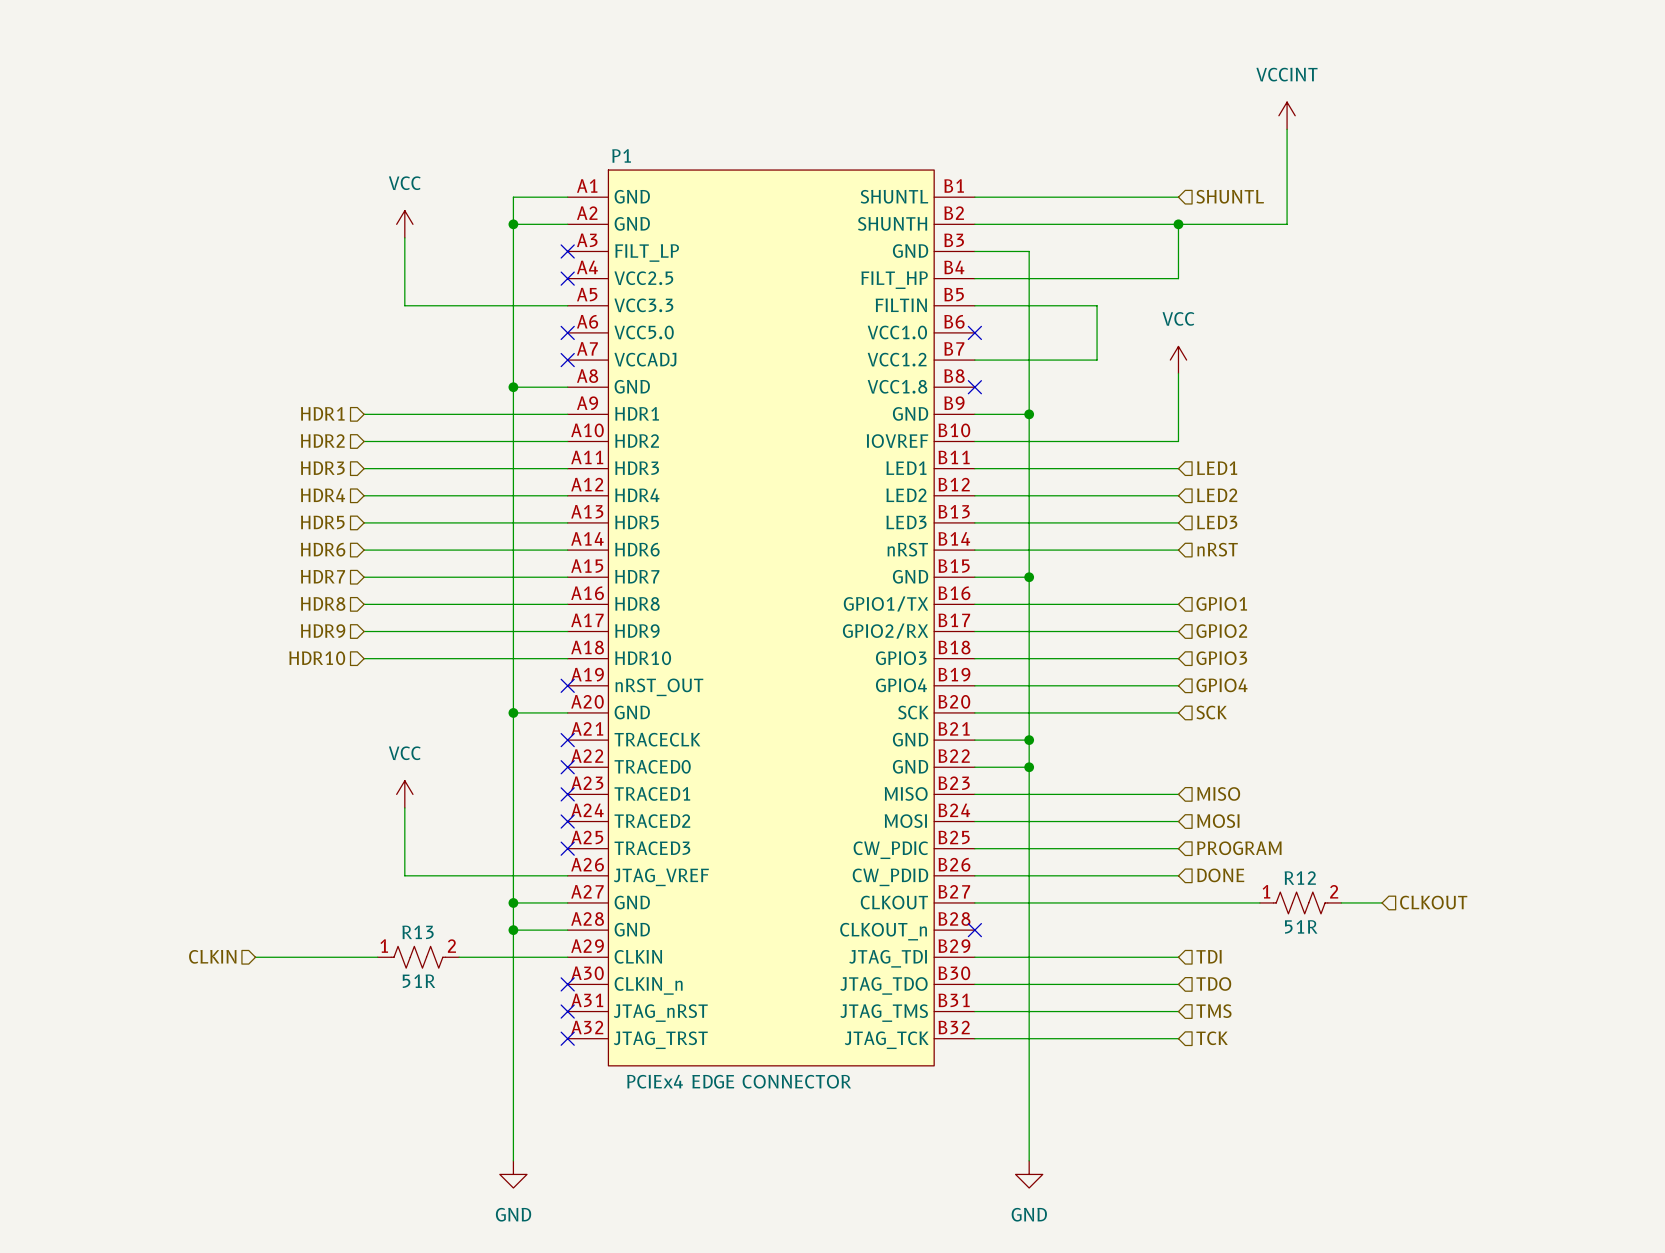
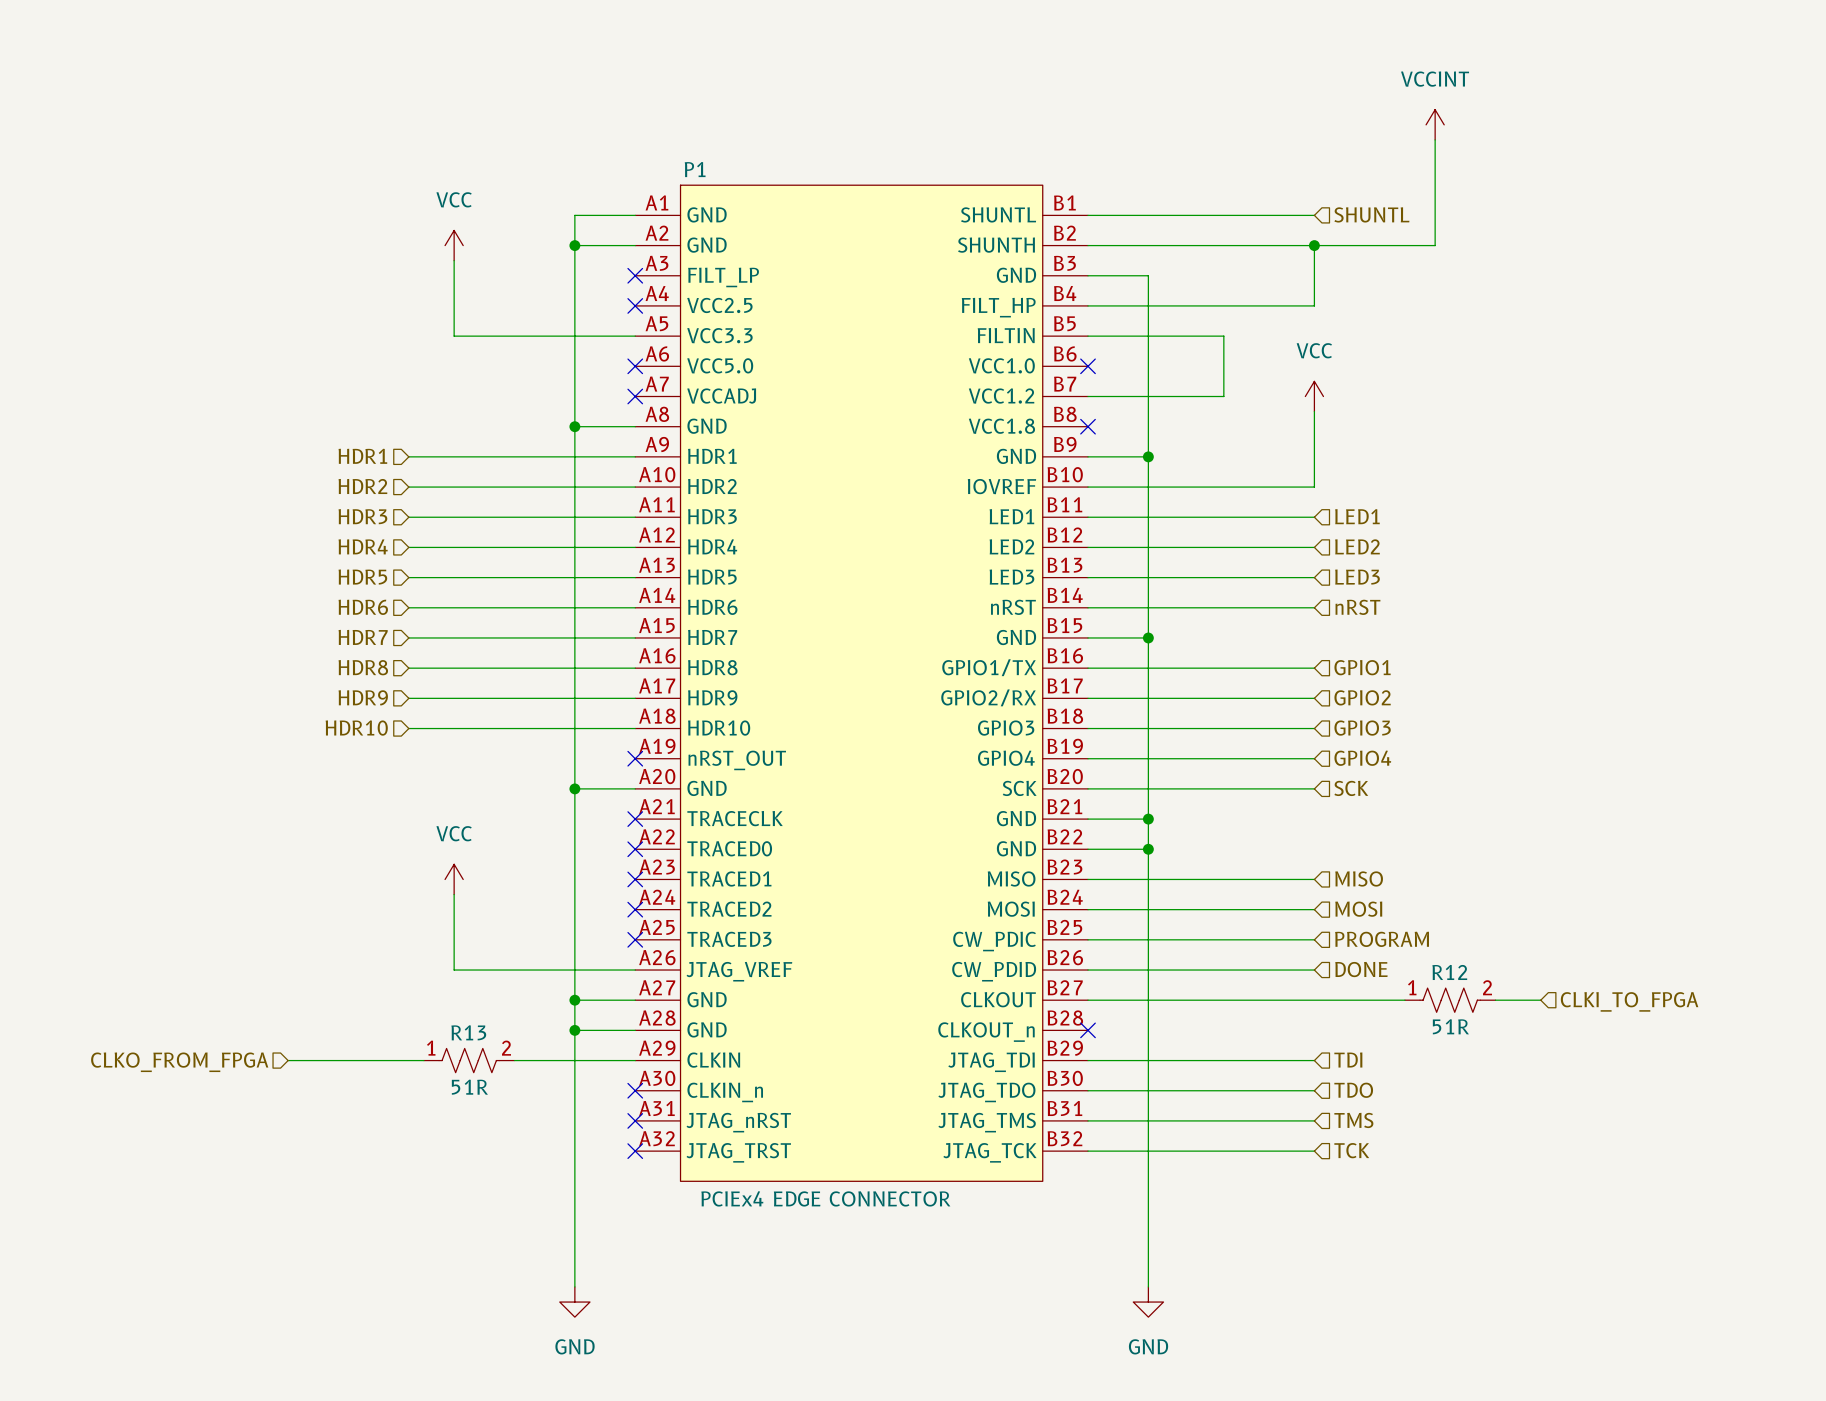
hierarchical label: CLKOUT (1433, 902) -> CLKI_TO_FPGA (1629, 1001)
hierarchical label: CLKIN (212, 956) -> CLKO_FROM_FPGA (179, 1062)

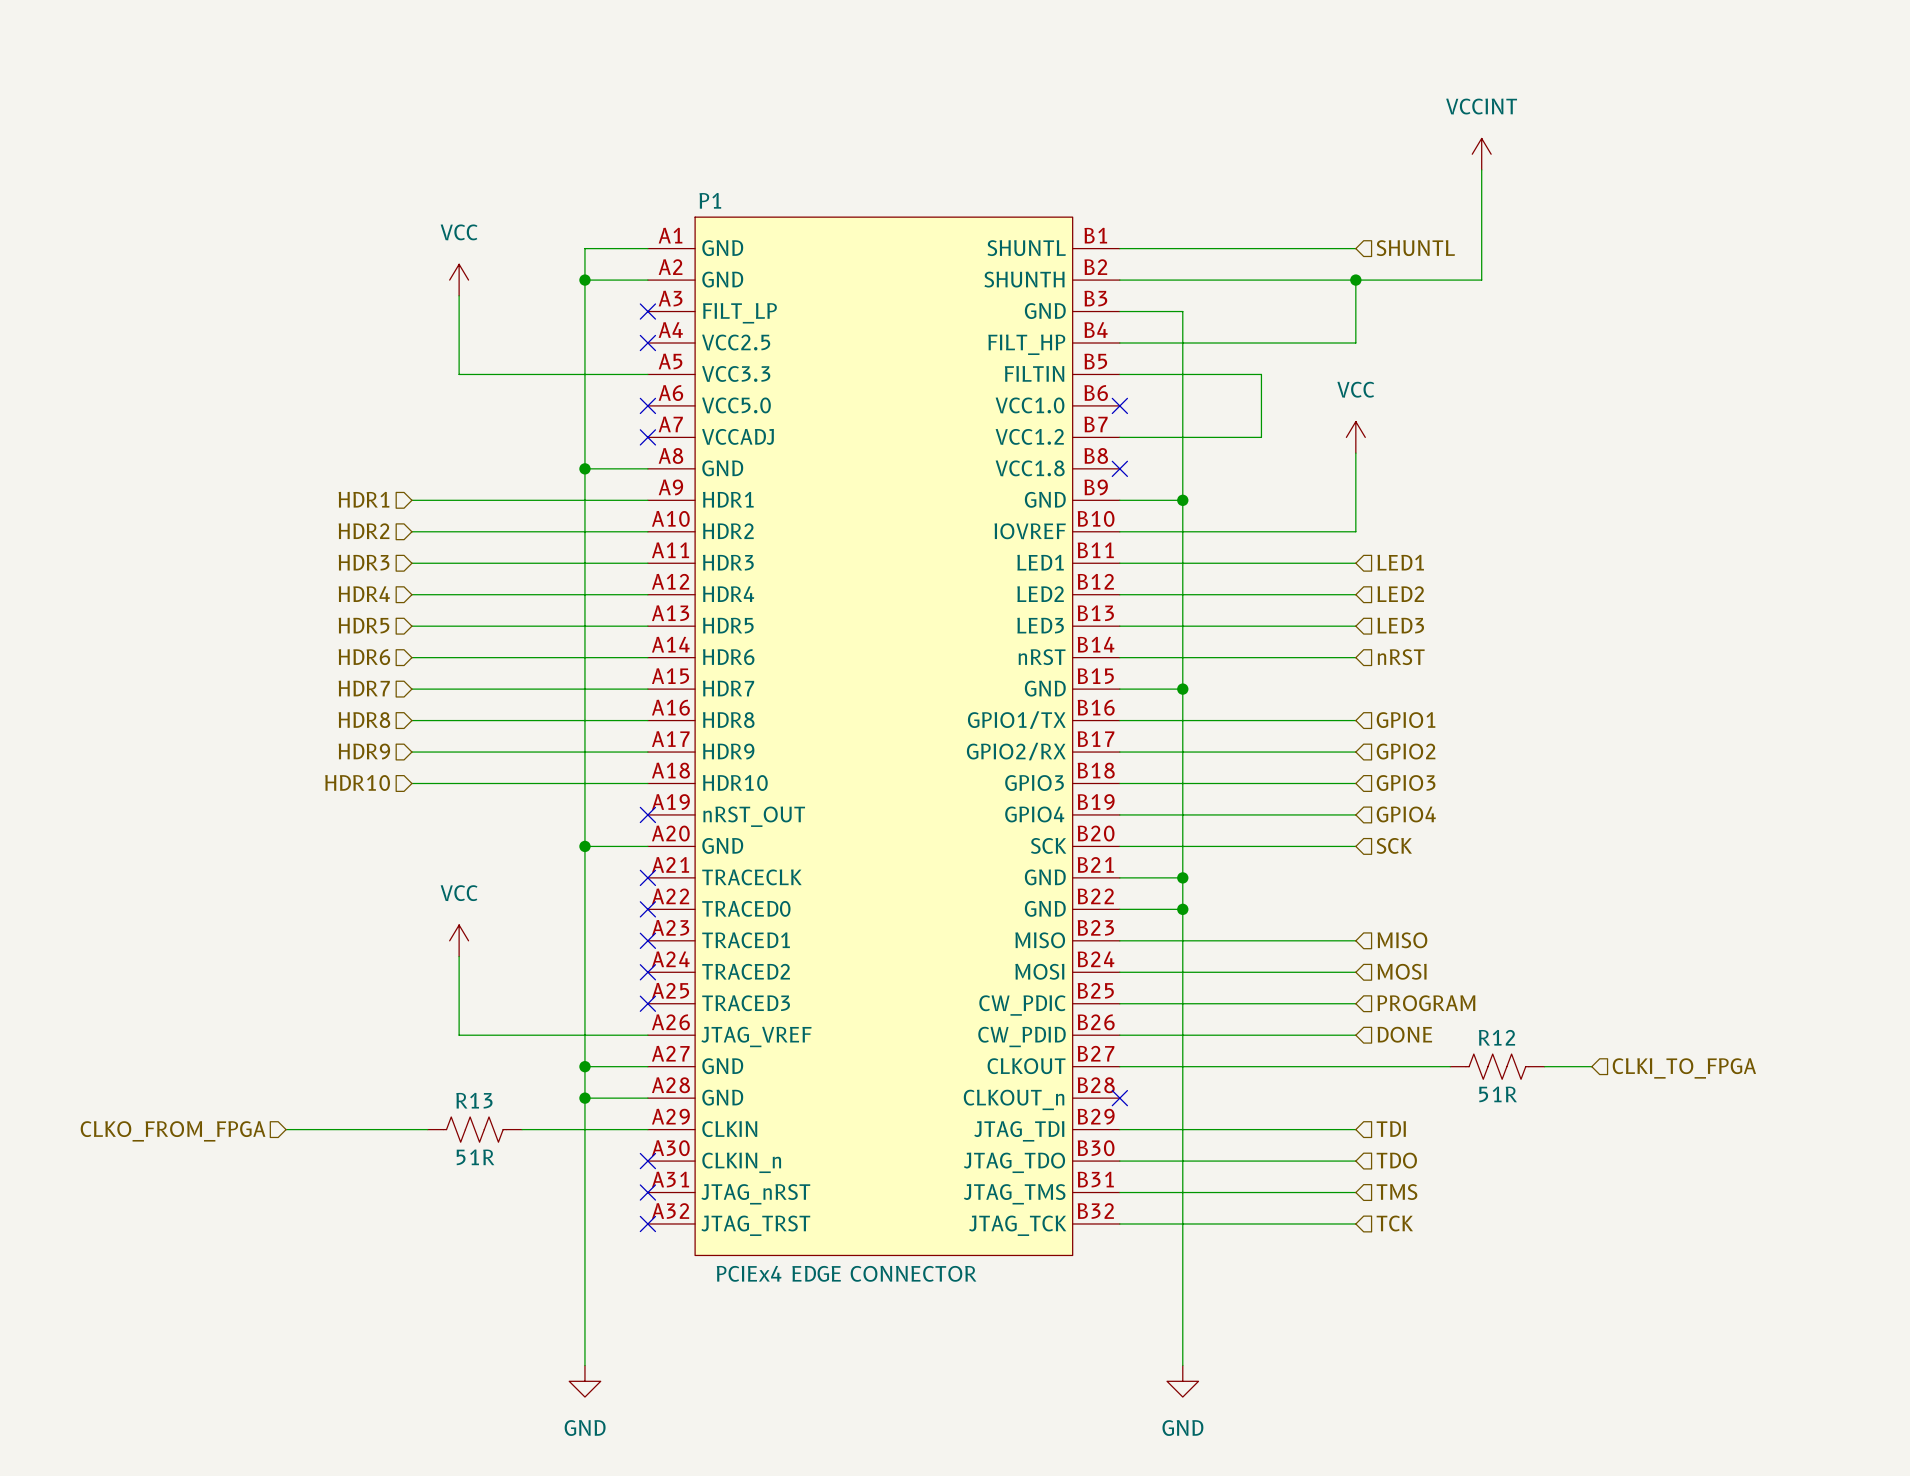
R12 pin number: 1 (1412, 987) -> none
R12 pin number: 2 (1487, 987) -> none
R13 pin number: 1 (431, 1048) -> none
R13 pin number: 2 (506, 1048) -> none

